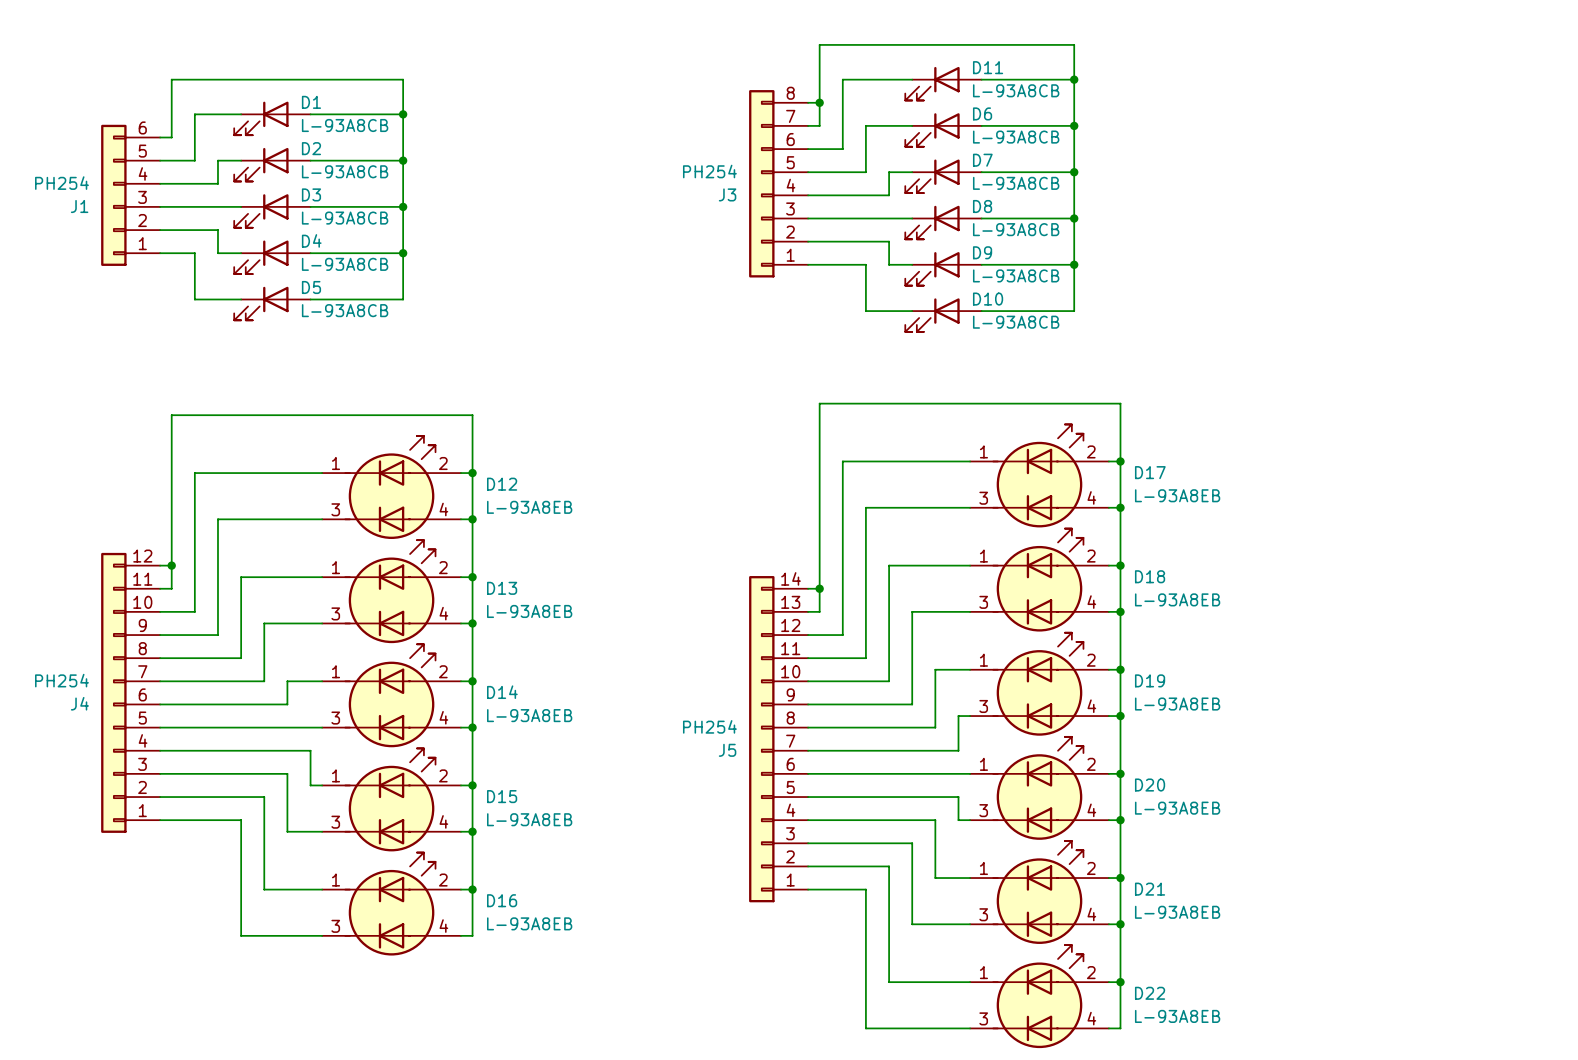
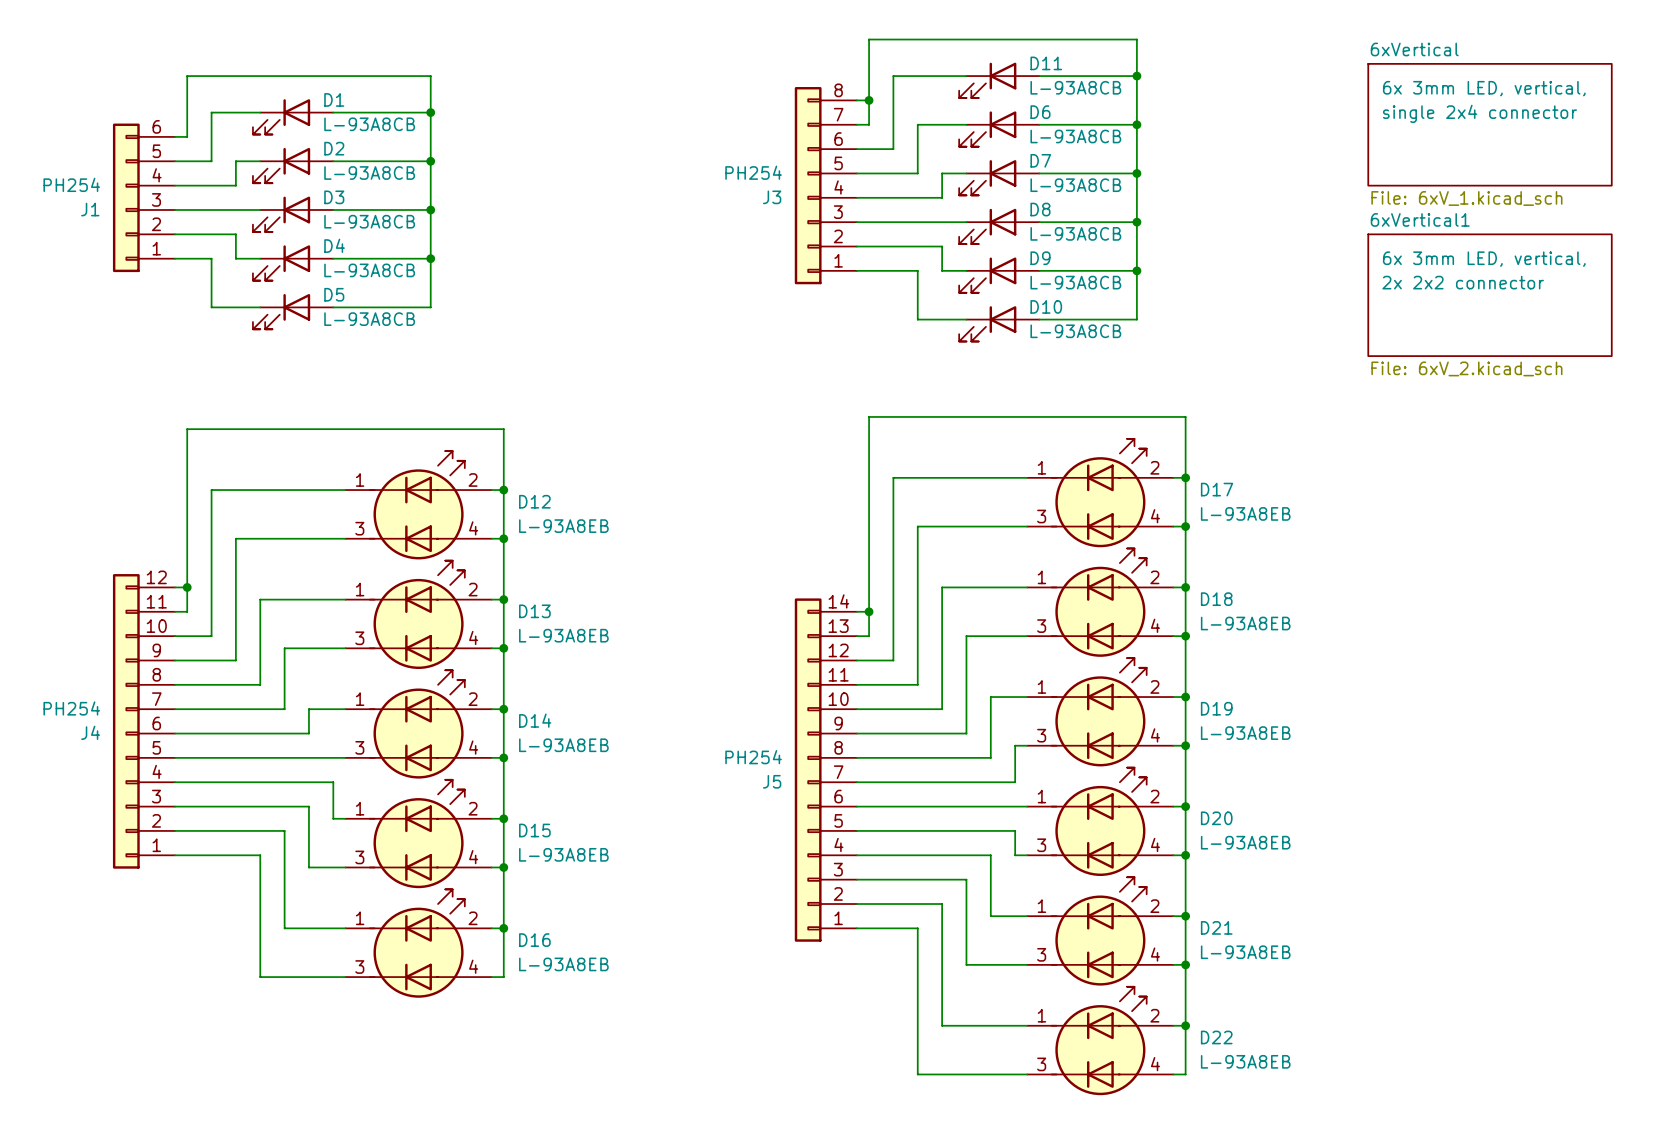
sheet 6xVertical: none -> File: 6xV_1.kicad_sch (1490, 124)
sheet 6xVertical1: none -> File: 6xV_2.kicad_sch (1490, 295)

